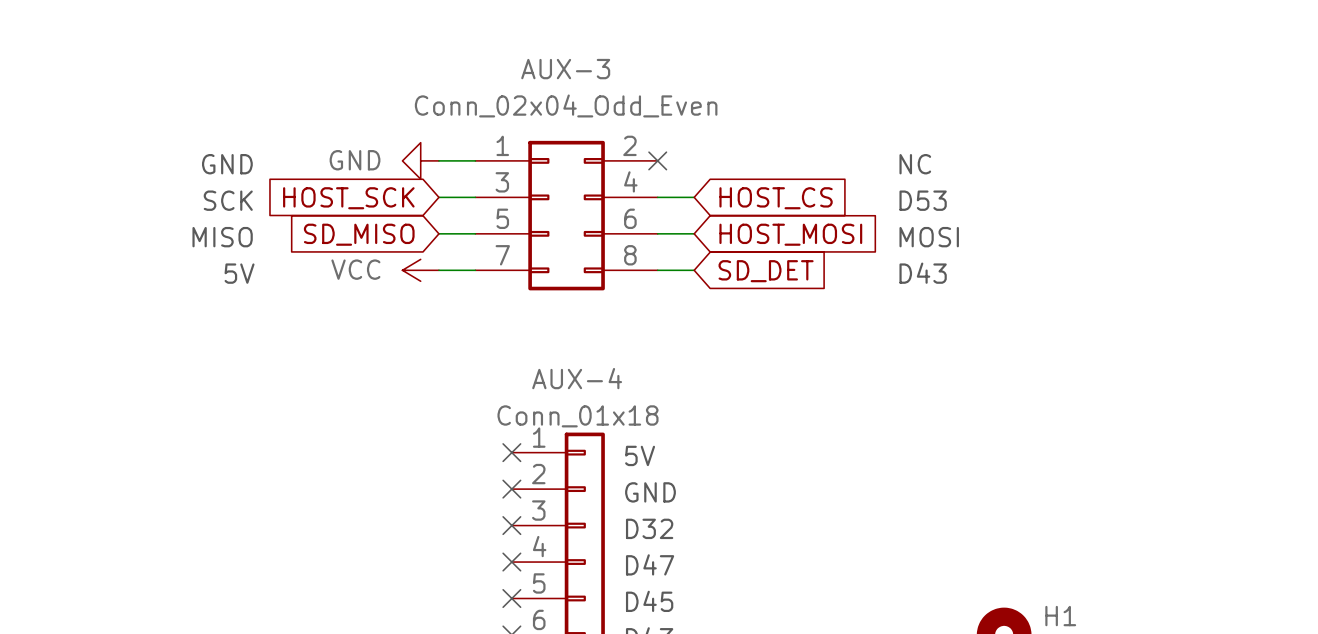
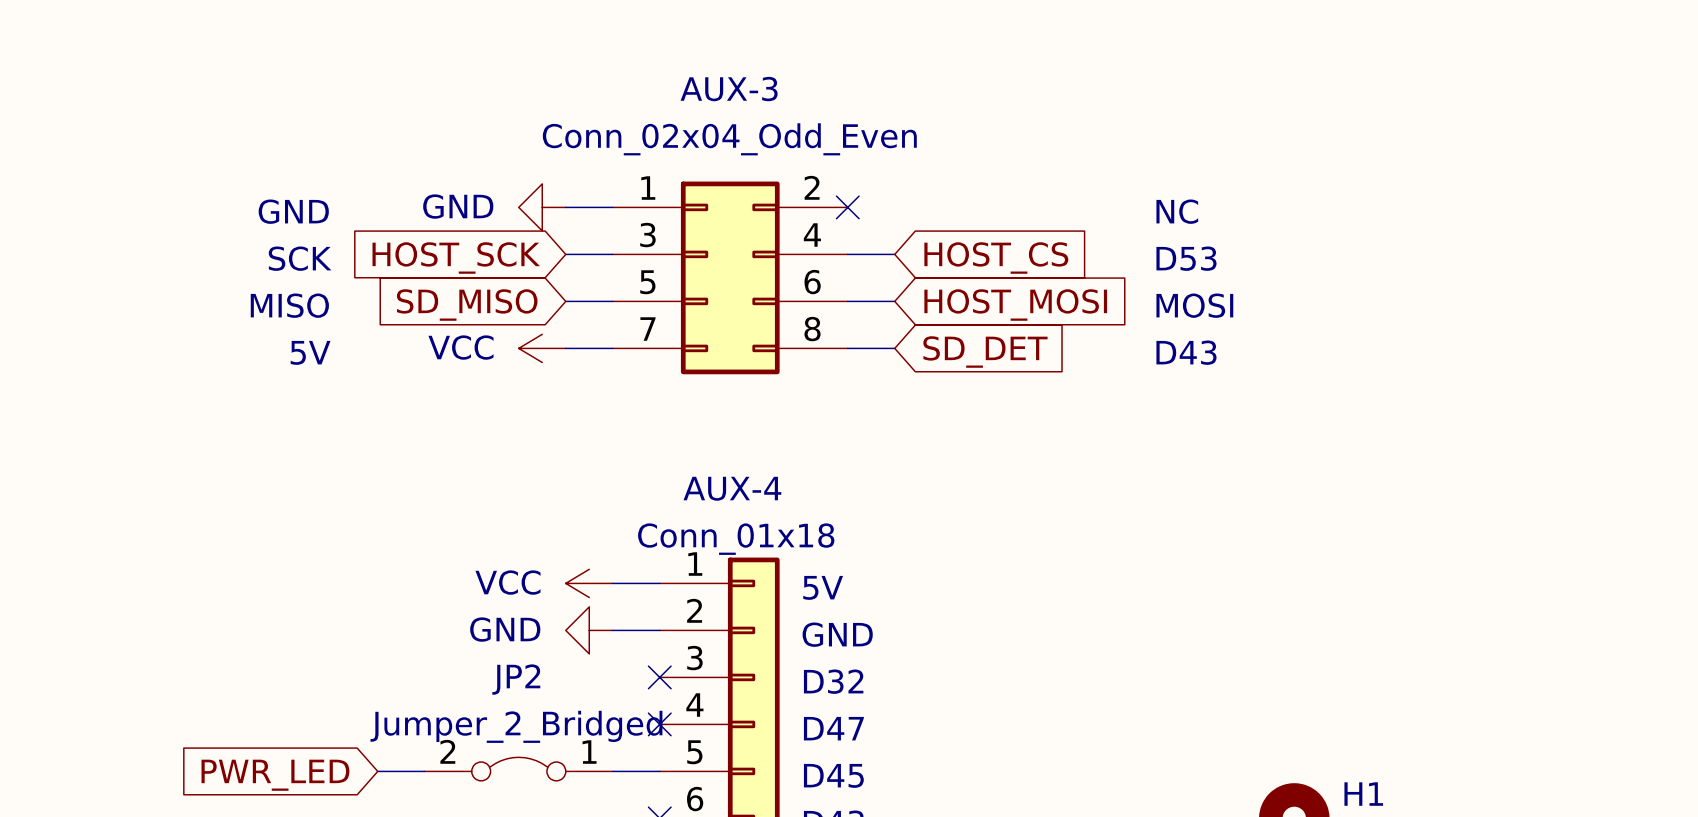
power symbol: none -> VCC (589, 583)
wire: none -> (612, 583) (659, 583)
no-connect mark: (511, 452) -> none
power symbol: none -> GND (589, 630)
wire: none -> (612, 630) (659, 630)
no-connect mark: (511, 489) -> none
JP2: none -> Jumper_2_Bridged (518, 769)
wire: none -> (377, 771) (424, 771)
wire: none -> (612, 771) (659, 771)
no-connect mark: (511, 598) -> none
global label: none -> PWR_LED (275, 775)

